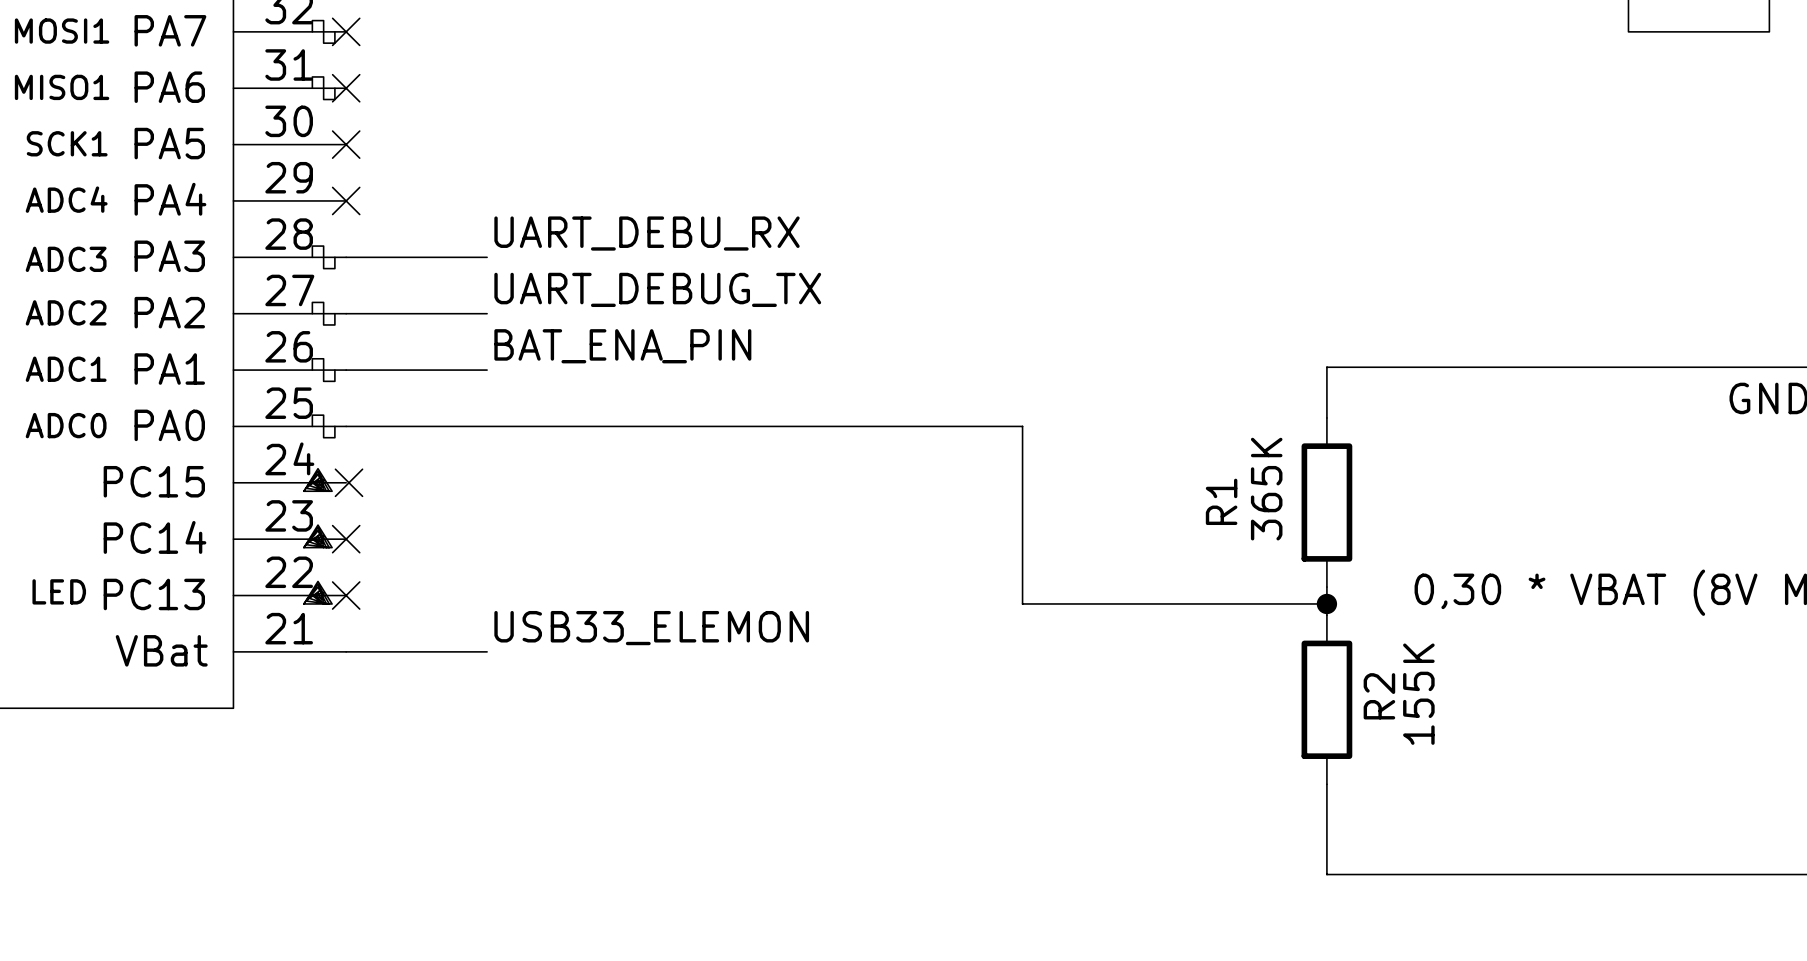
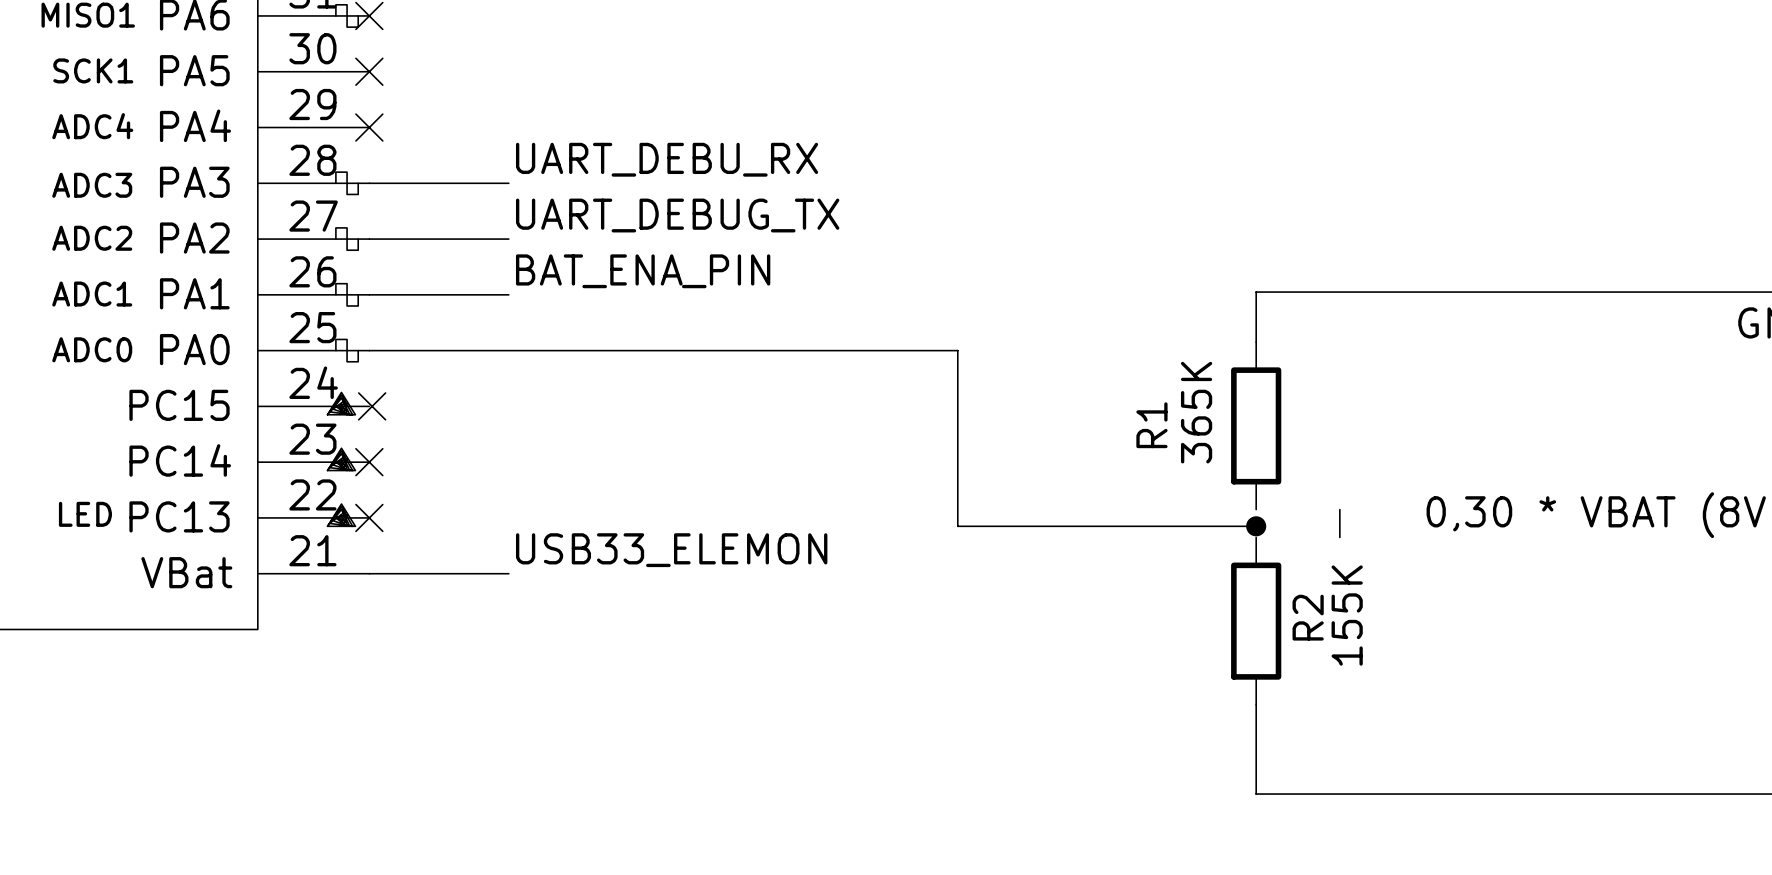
wire: (1326, 367) (1326, 417) -> (1339, 292) (1256, 292) (1256, 342)
wire: (940, 426) (1022, 426) (1022, 603) -> (957, 350) (957, 526) (1038, 526)
R1 position: (1326, 502) -> (1256, 425)
wire: (1242, 603) (1326, 603) -> none
junction position: (1326, 603) -> (1256, 526)
R2 position: (1326, 699) -> (1256, 621)
wire: (1326, 784) (1326, 874) -> (1256, 704) (1256, 794) (1339, 794)

